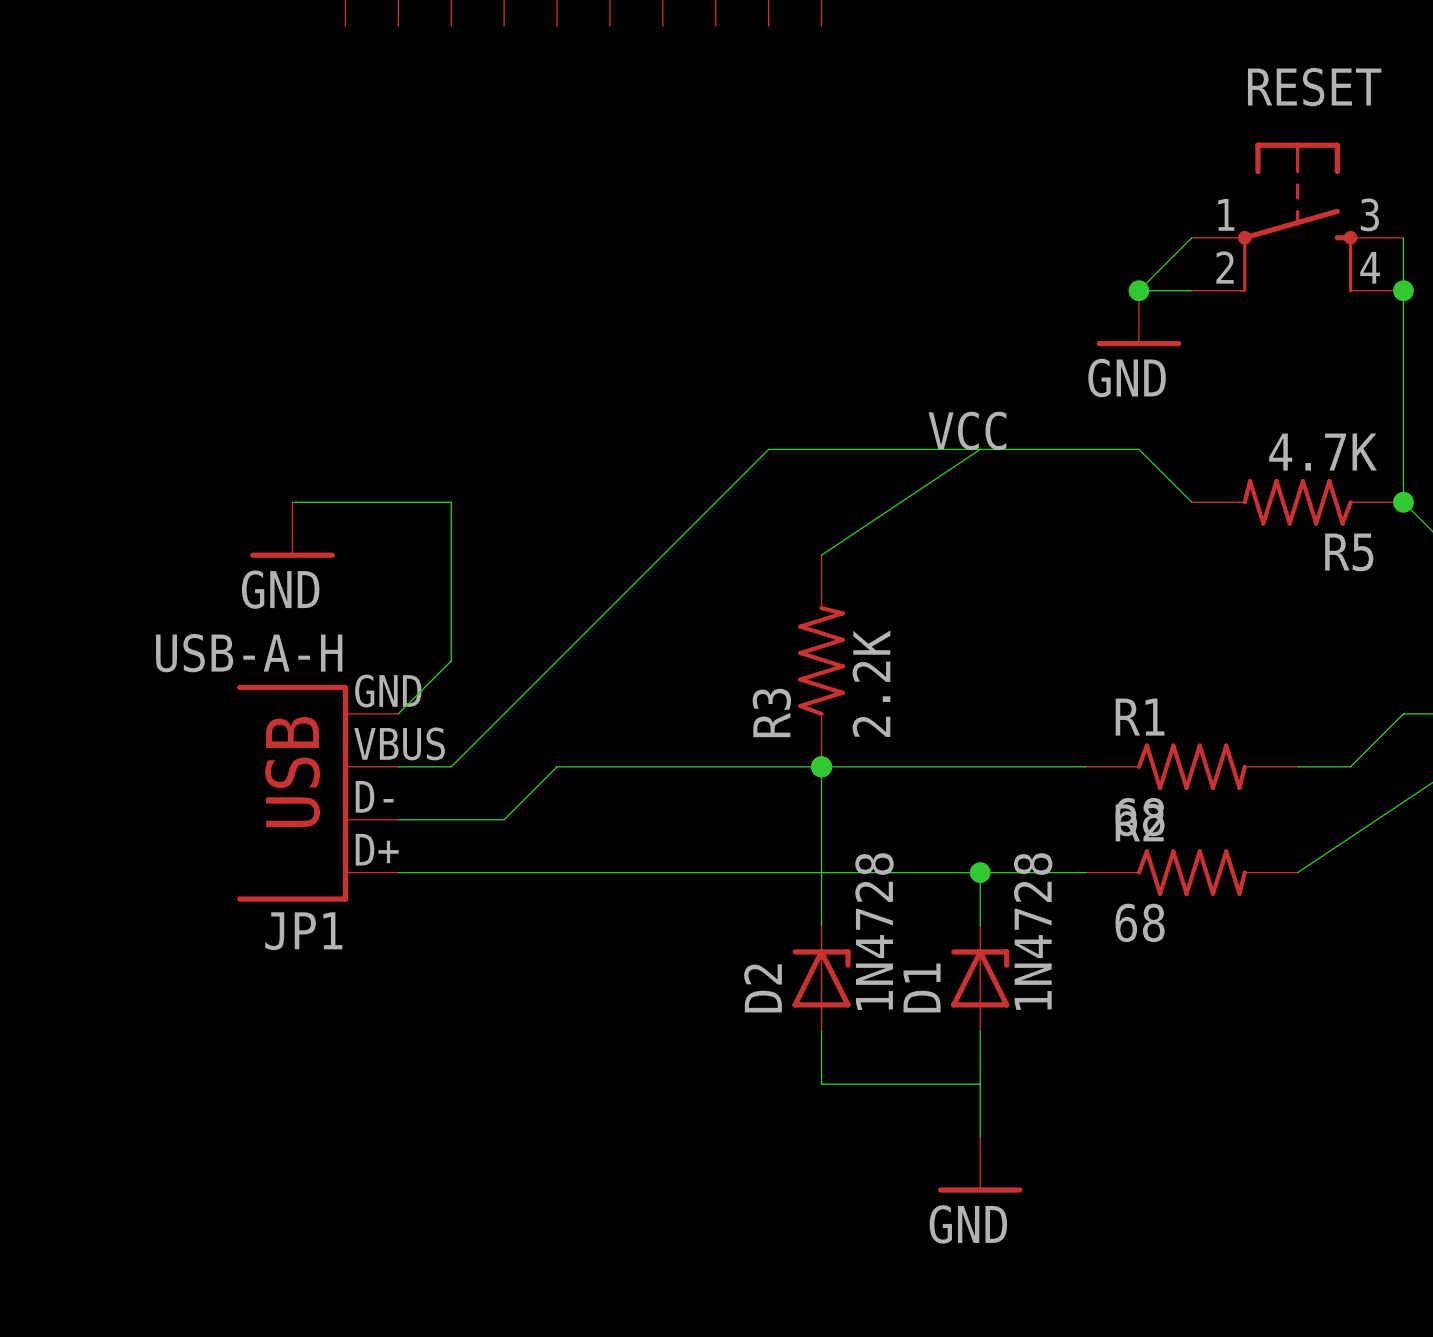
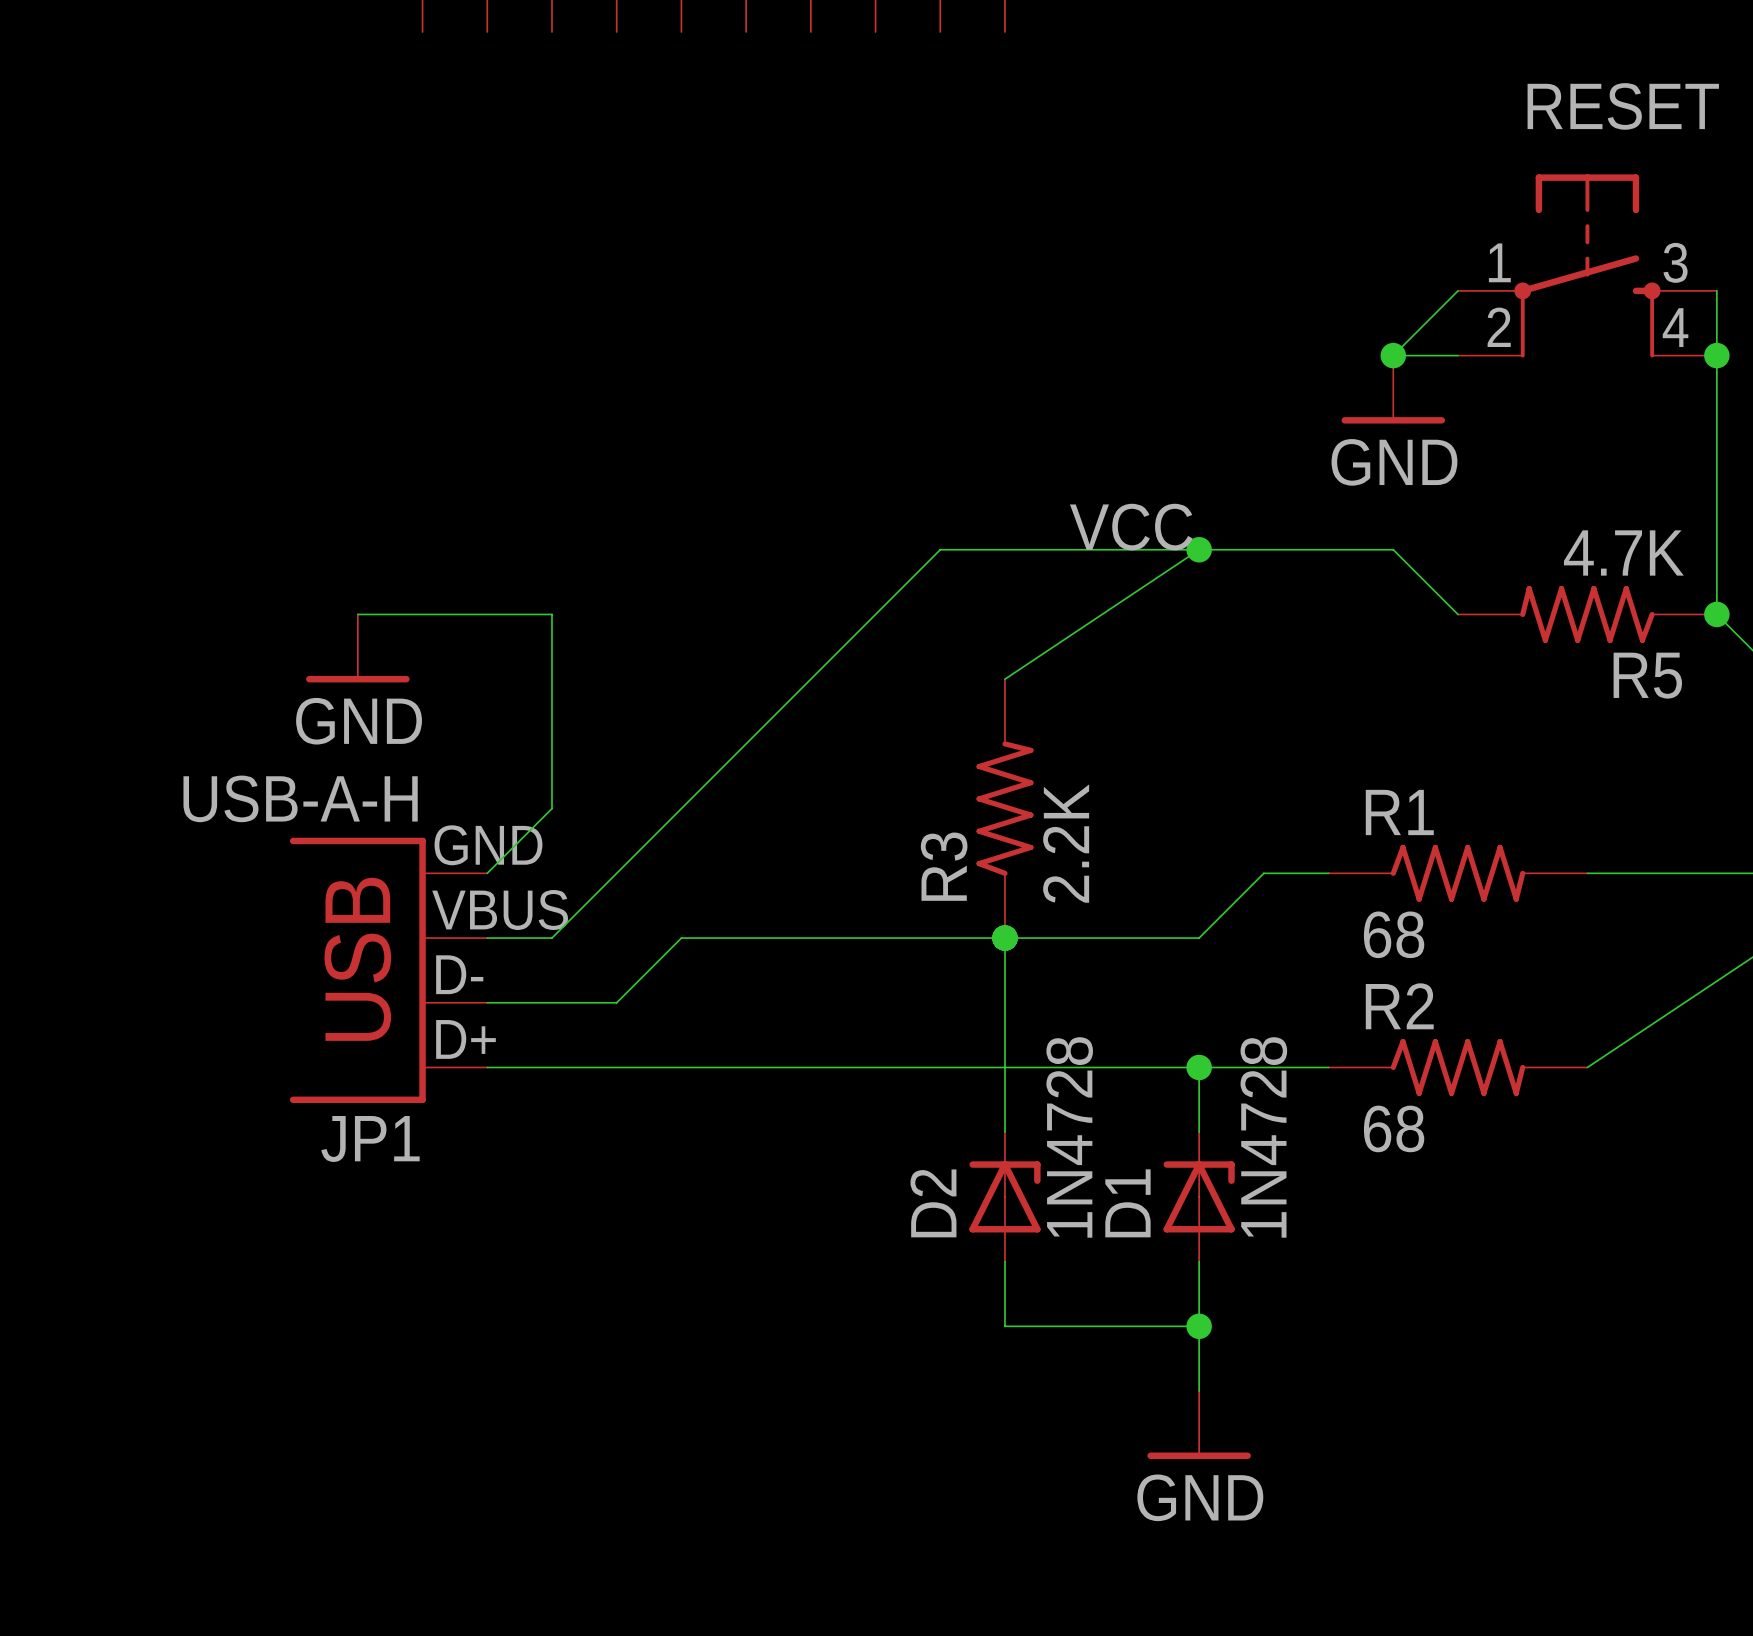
label position: VCC (967, 430) -> VCC (1131, 527)
junction: none -> (1199, 549)
wire: (1403, 713) (1350, 766) (1297, 766) -> (1716, 873) (1587, 873)
wire: (980, 766) (1086, 766) -> (1199, 938) (1263, 873) (1328, 873)
R1 position: (1191, 766) -> (1458, 873)
junction: none -> (1199, 1326)

